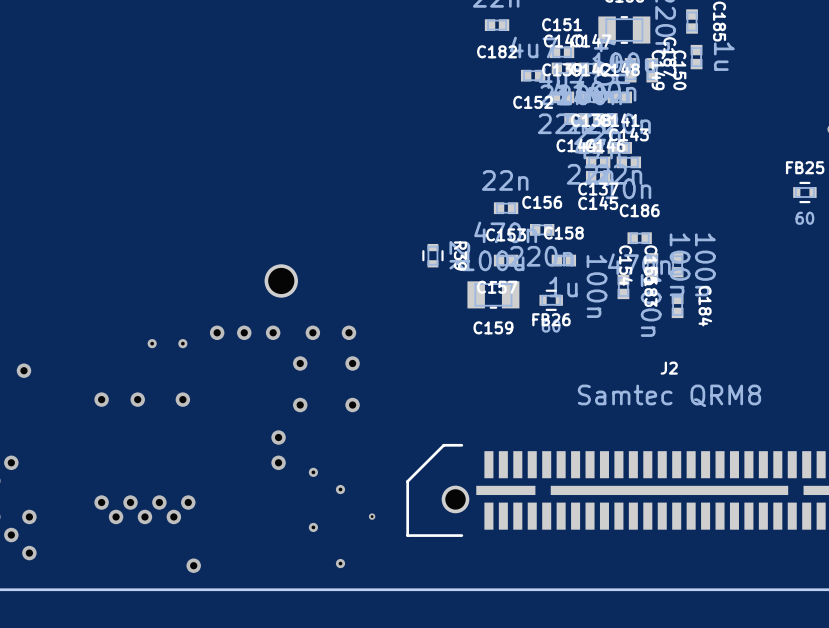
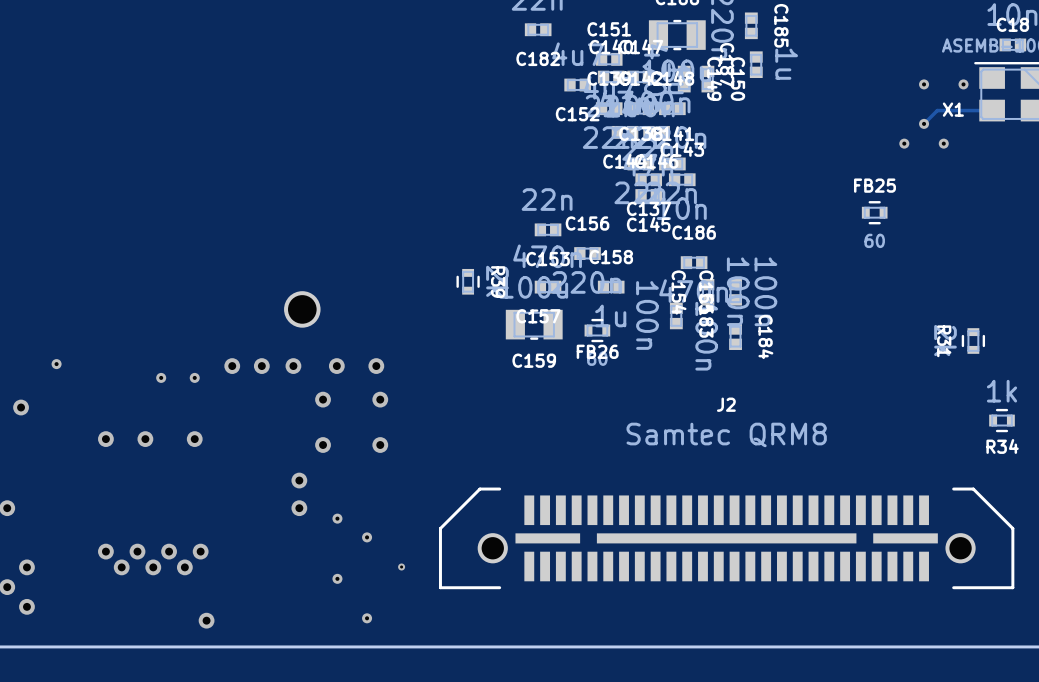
via: none -> (56, 364)

